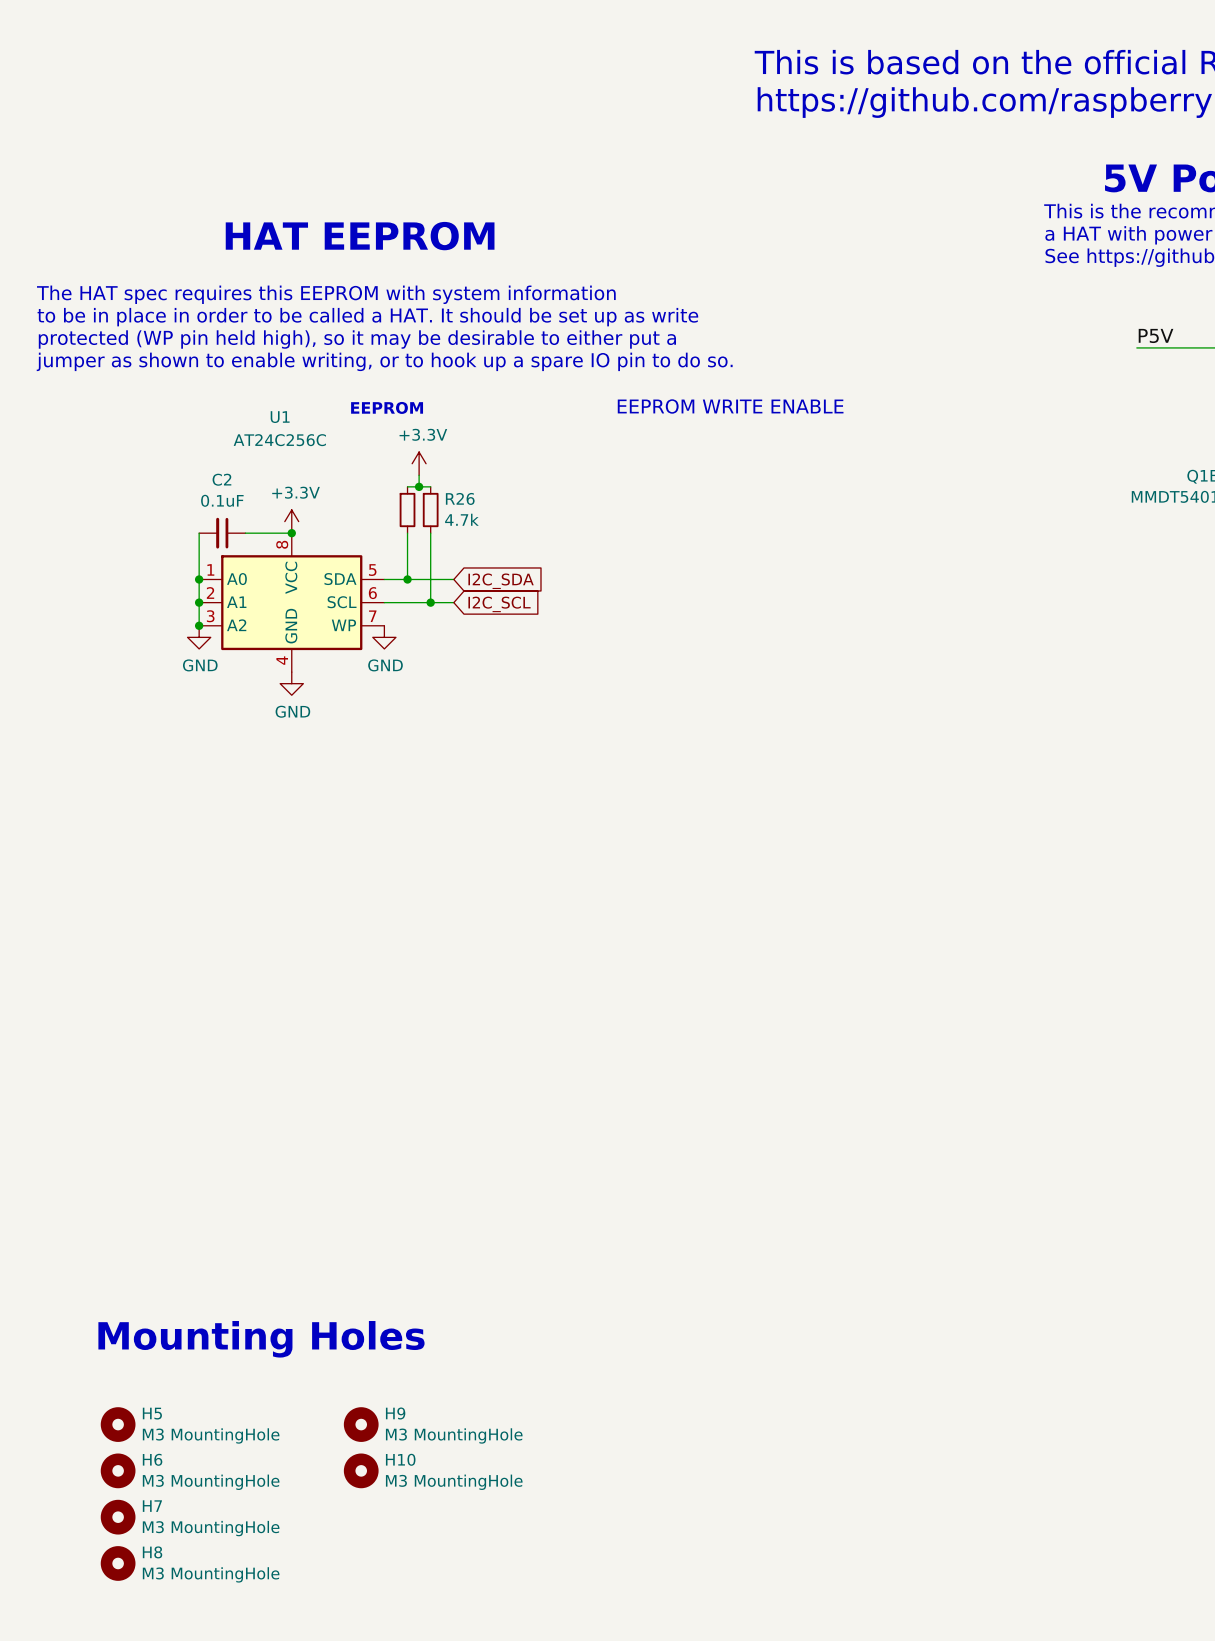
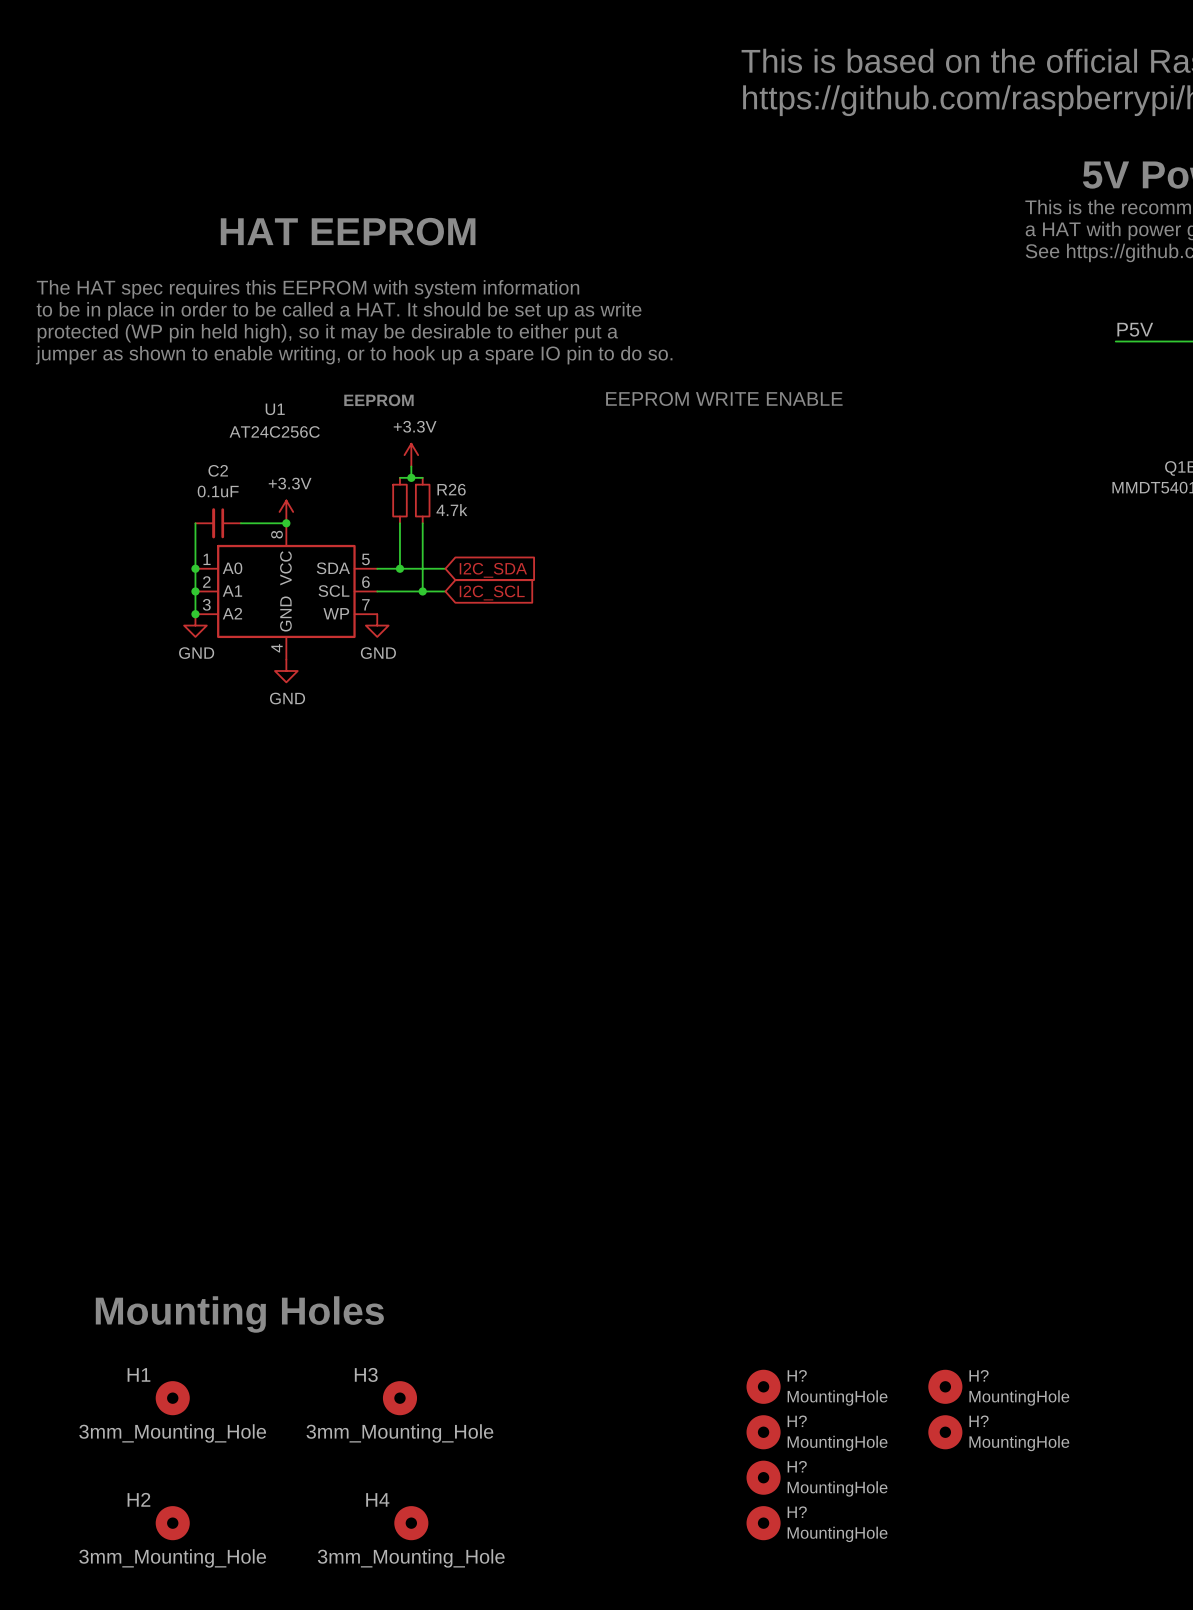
H?: none -> MountingHole (763, 1386)
H?: none -> MountingHole (945, 1386)
H5: M3 MountingHole (118, 1424) -> none
H1: none -> 3mm_Mounting_Hole (172, 1398)
H9: M3 MountingHole (361, 1424) -> none
H3: none -> 3mm_Mounting_Hole (399, 1398)
H?: none -> MountingHole (763, 1432)
H?: none -> MountingHole (945, 1432)
H6: M3 MountingHole (118, 1470) -> none
H10: M3 MountingHole (361, 1470) -> none
H?: none -> MountingHole (763, 1477)
H7: M3 MountingHole (118, 1517) -> none
H2: none -> 3mm_Mounting_Hole (172, 1523)
H4: none -> 3mm_Mounting_Hole (411, 1523)
H?: none -> MountingHole (763, 1523)
H8: M3 MountingHole (118, 1563) -> none

